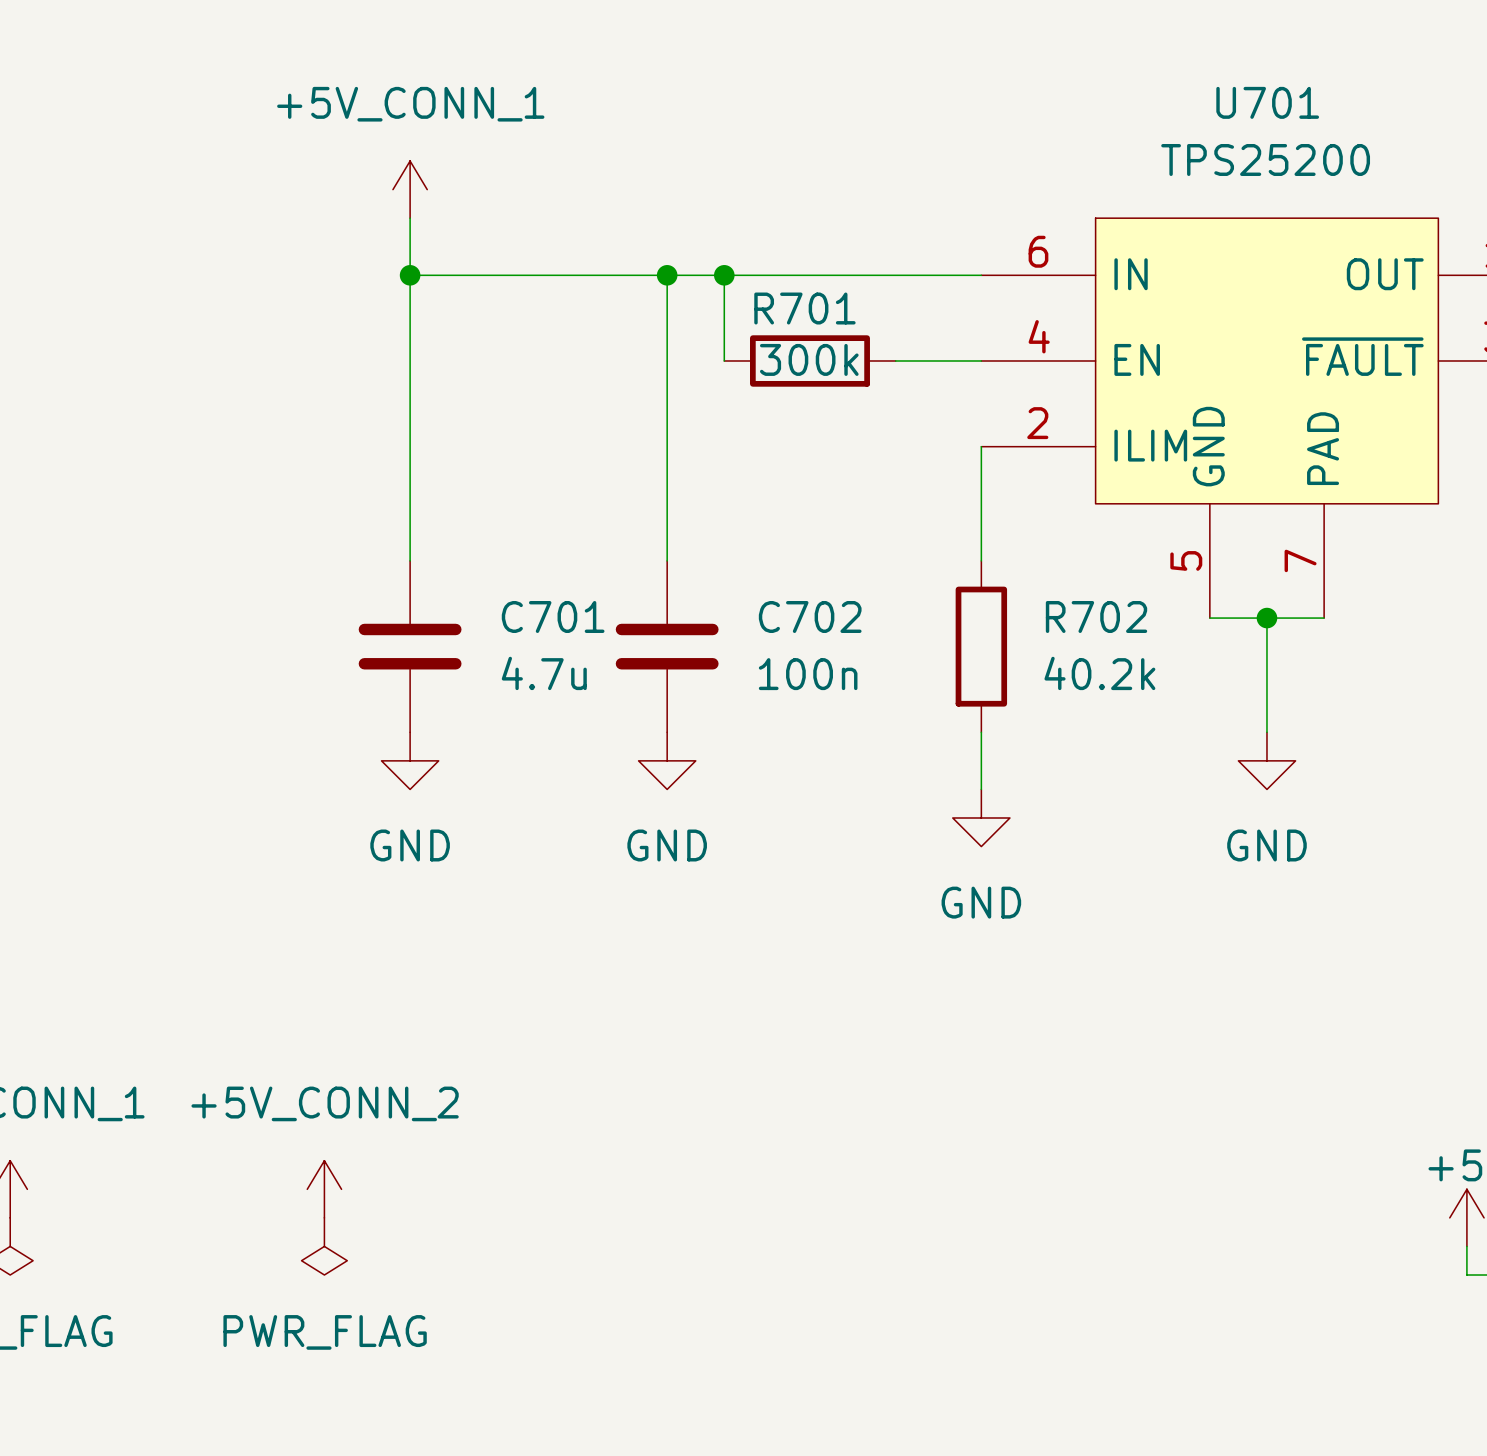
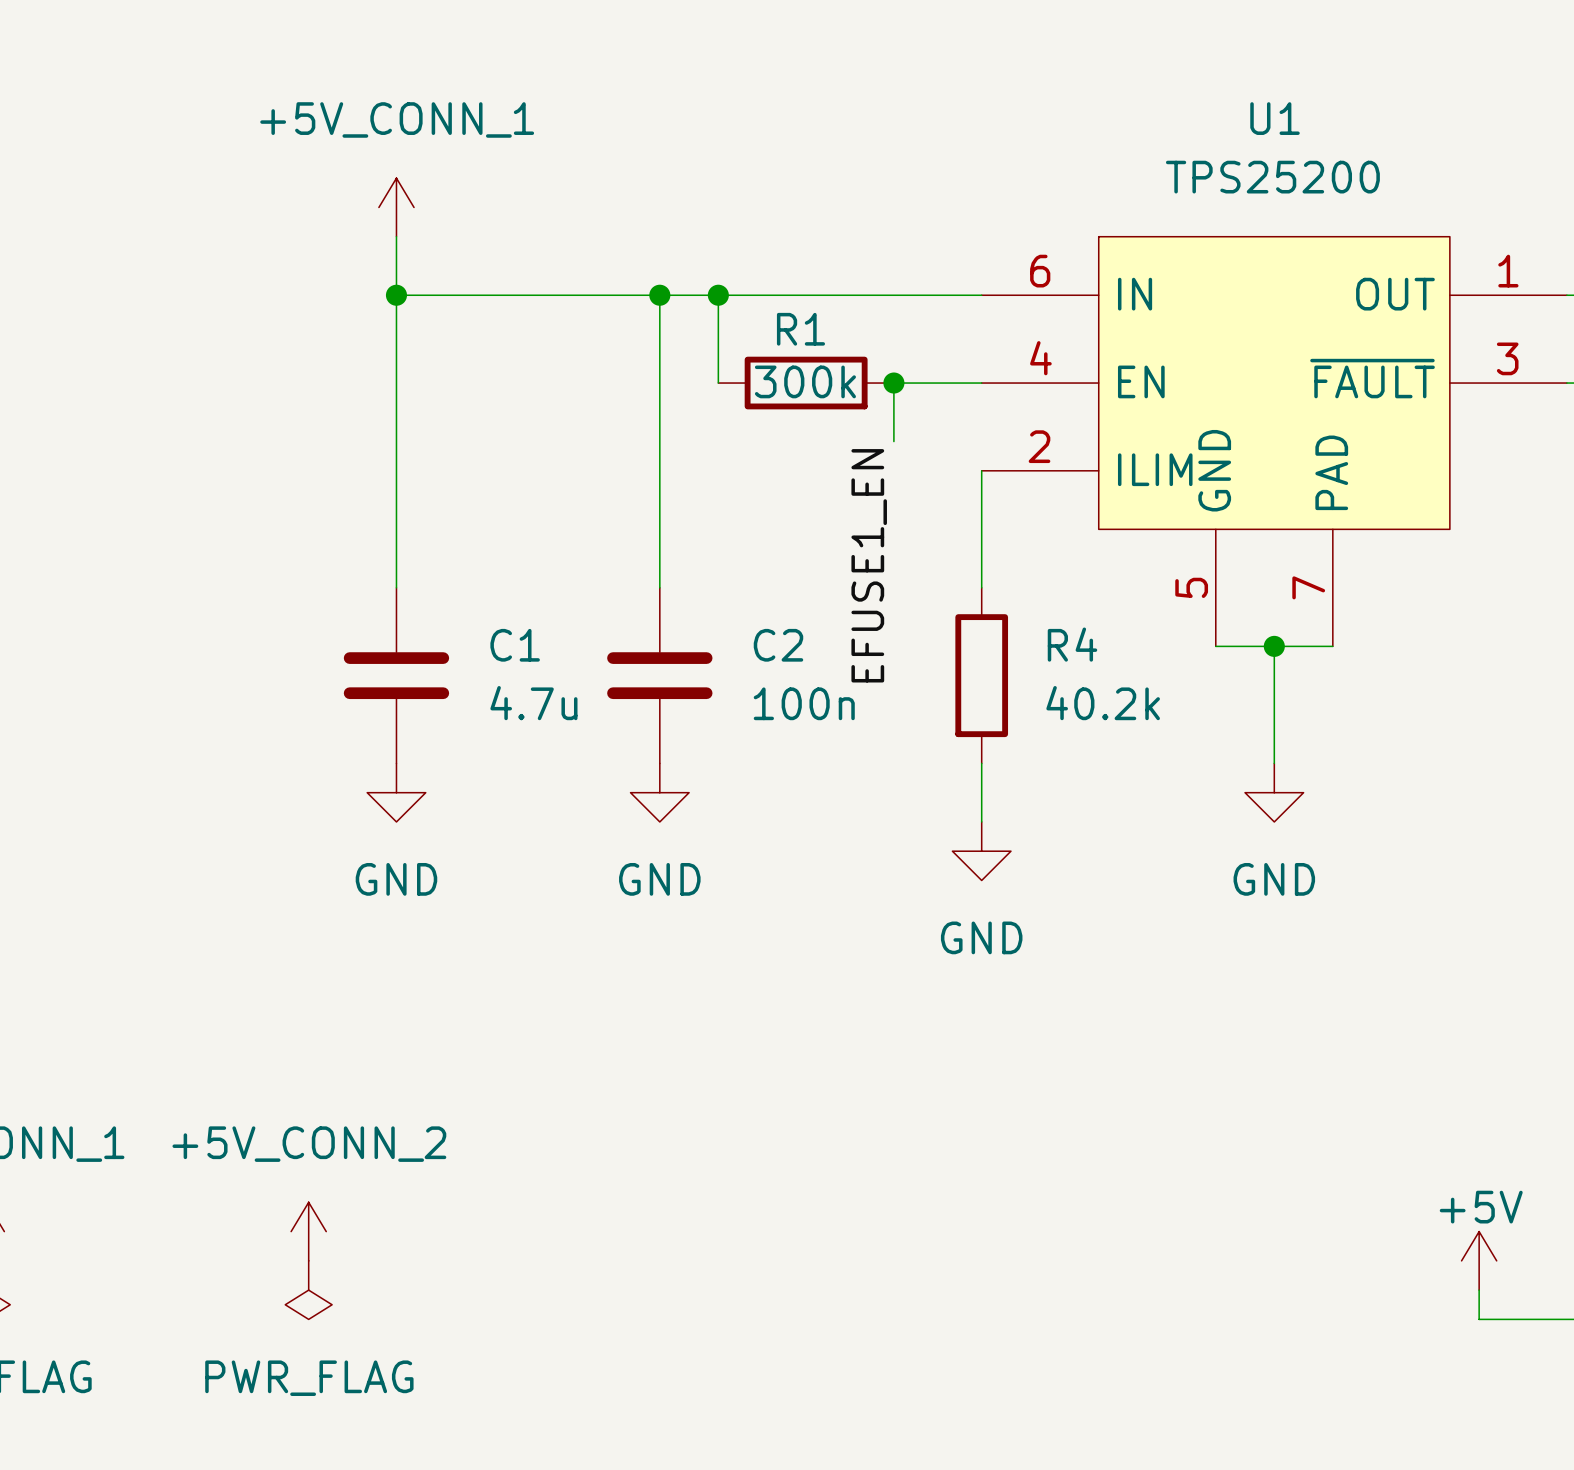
U701 name: U701 (1267, 102) -> U1 (1275, 118)
R701 name: R701 (804, 308) -> R1 (800, 329)
wire: none -> (893, 383) (893, 441)
junction: none -> (893, 383)
label: none -> EFUSE1_EN (869, 565)
C701 name: C701 (553, 616) -> C1 (515, 645)
C702 name: C702 (810, 616) -> C2 (778, 645)
R702 name: R702 (1096, 616) -> R4 (1072, 644)

